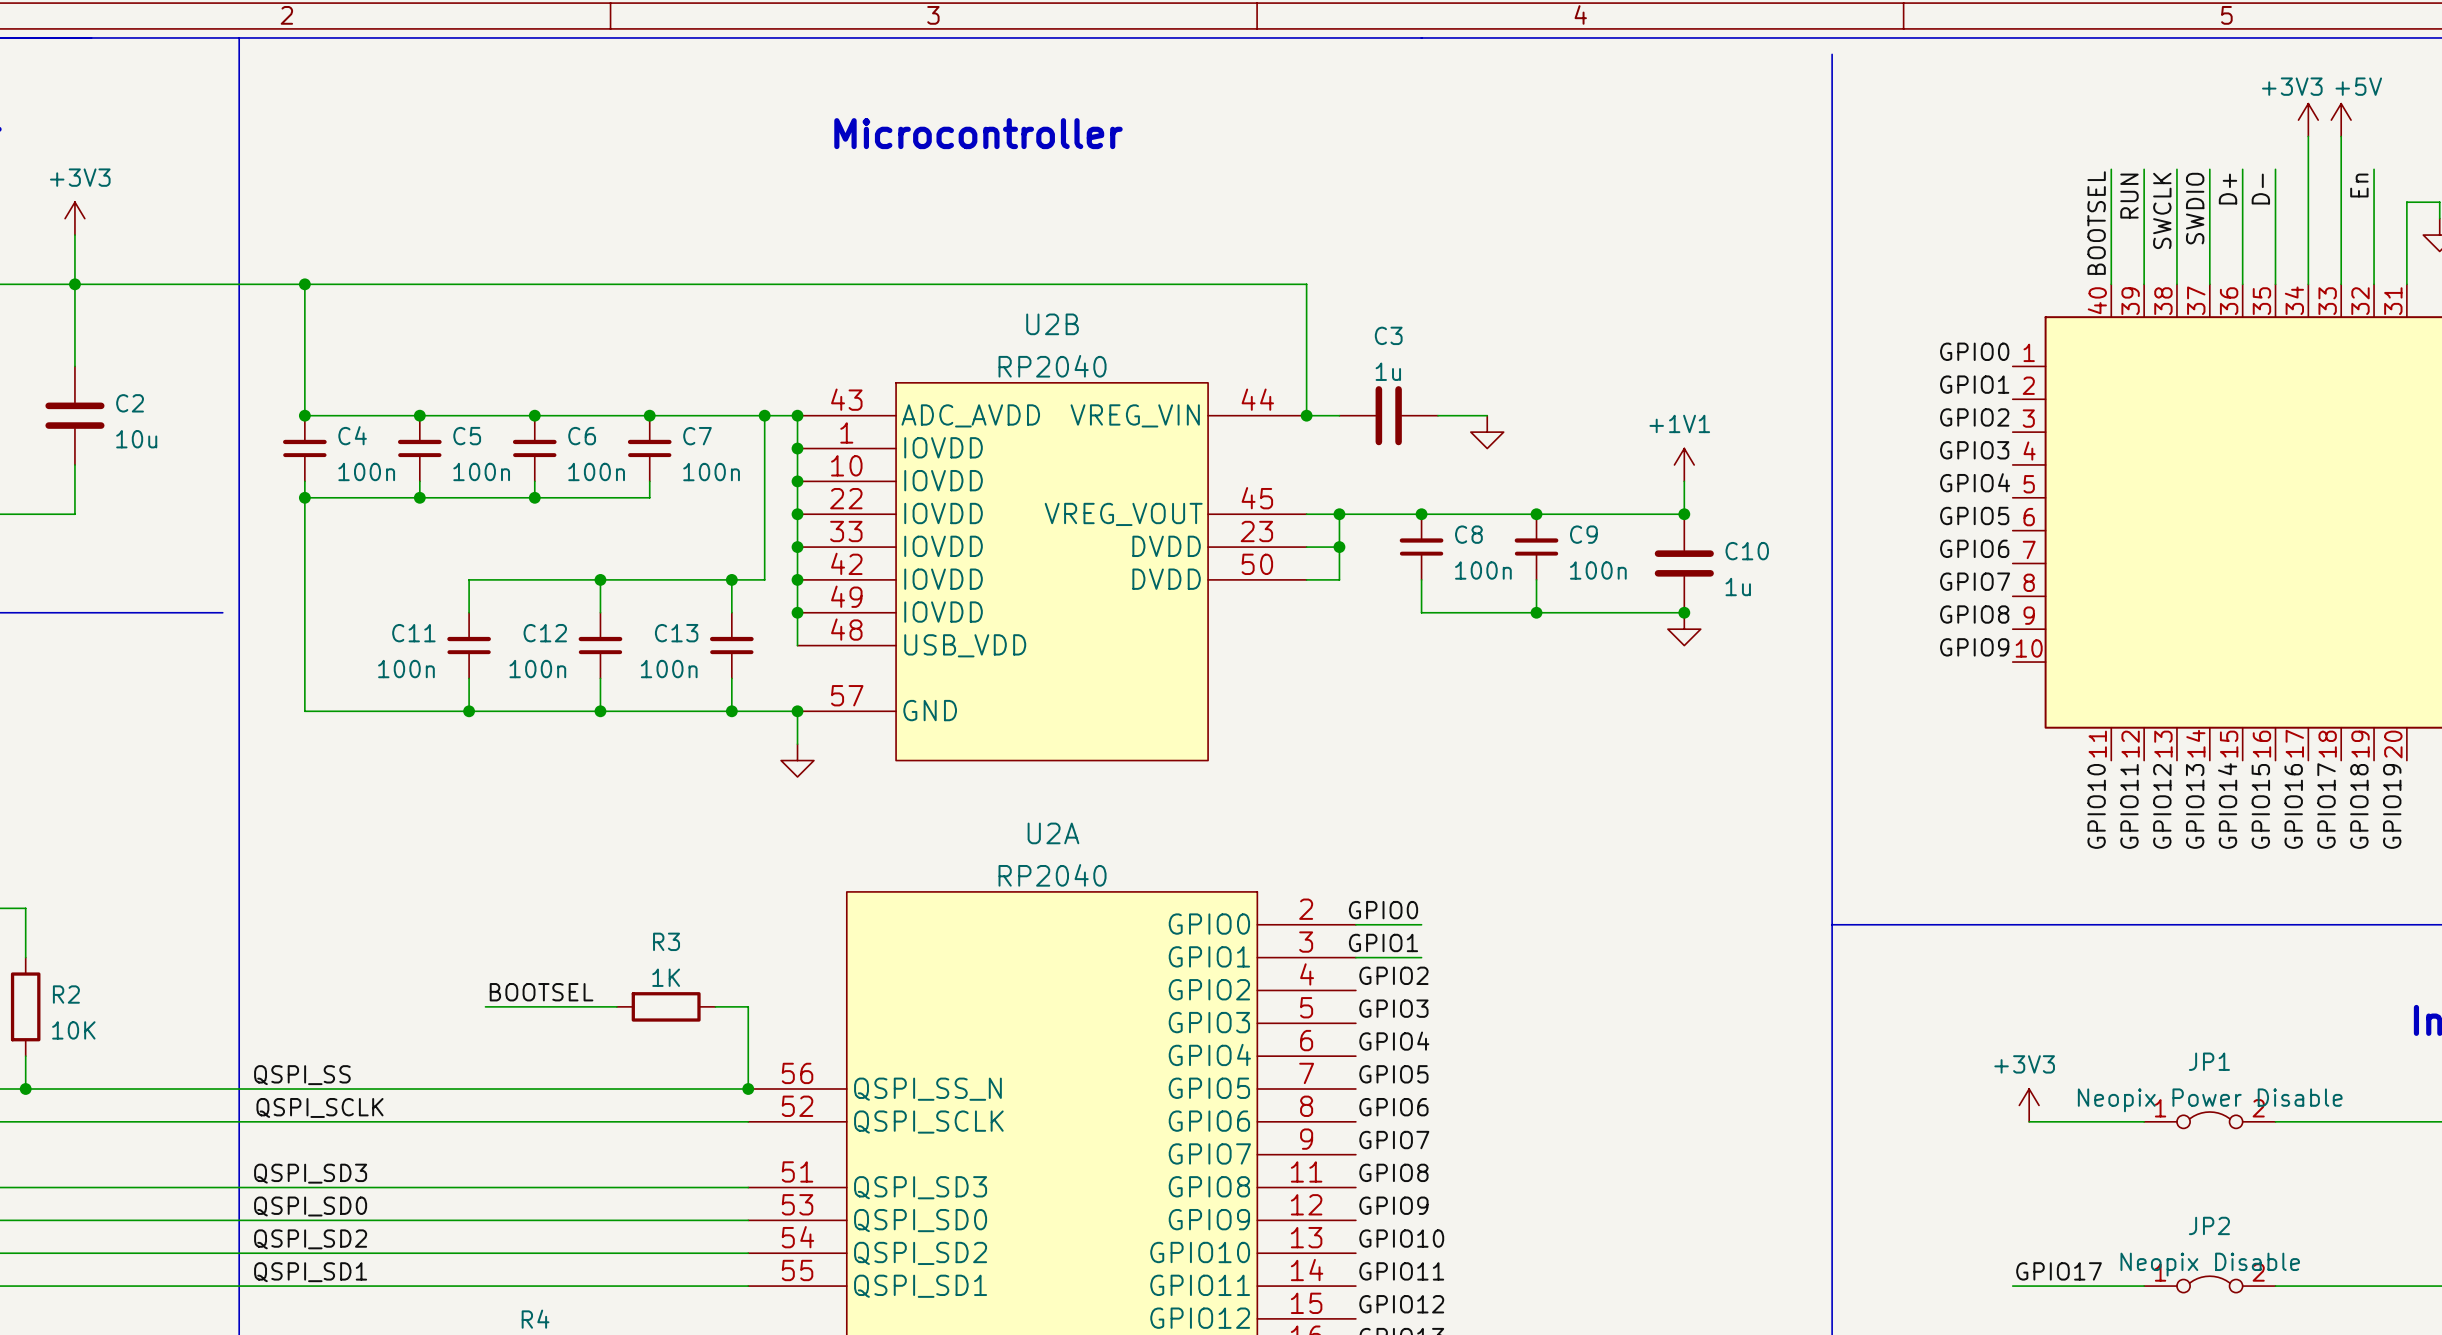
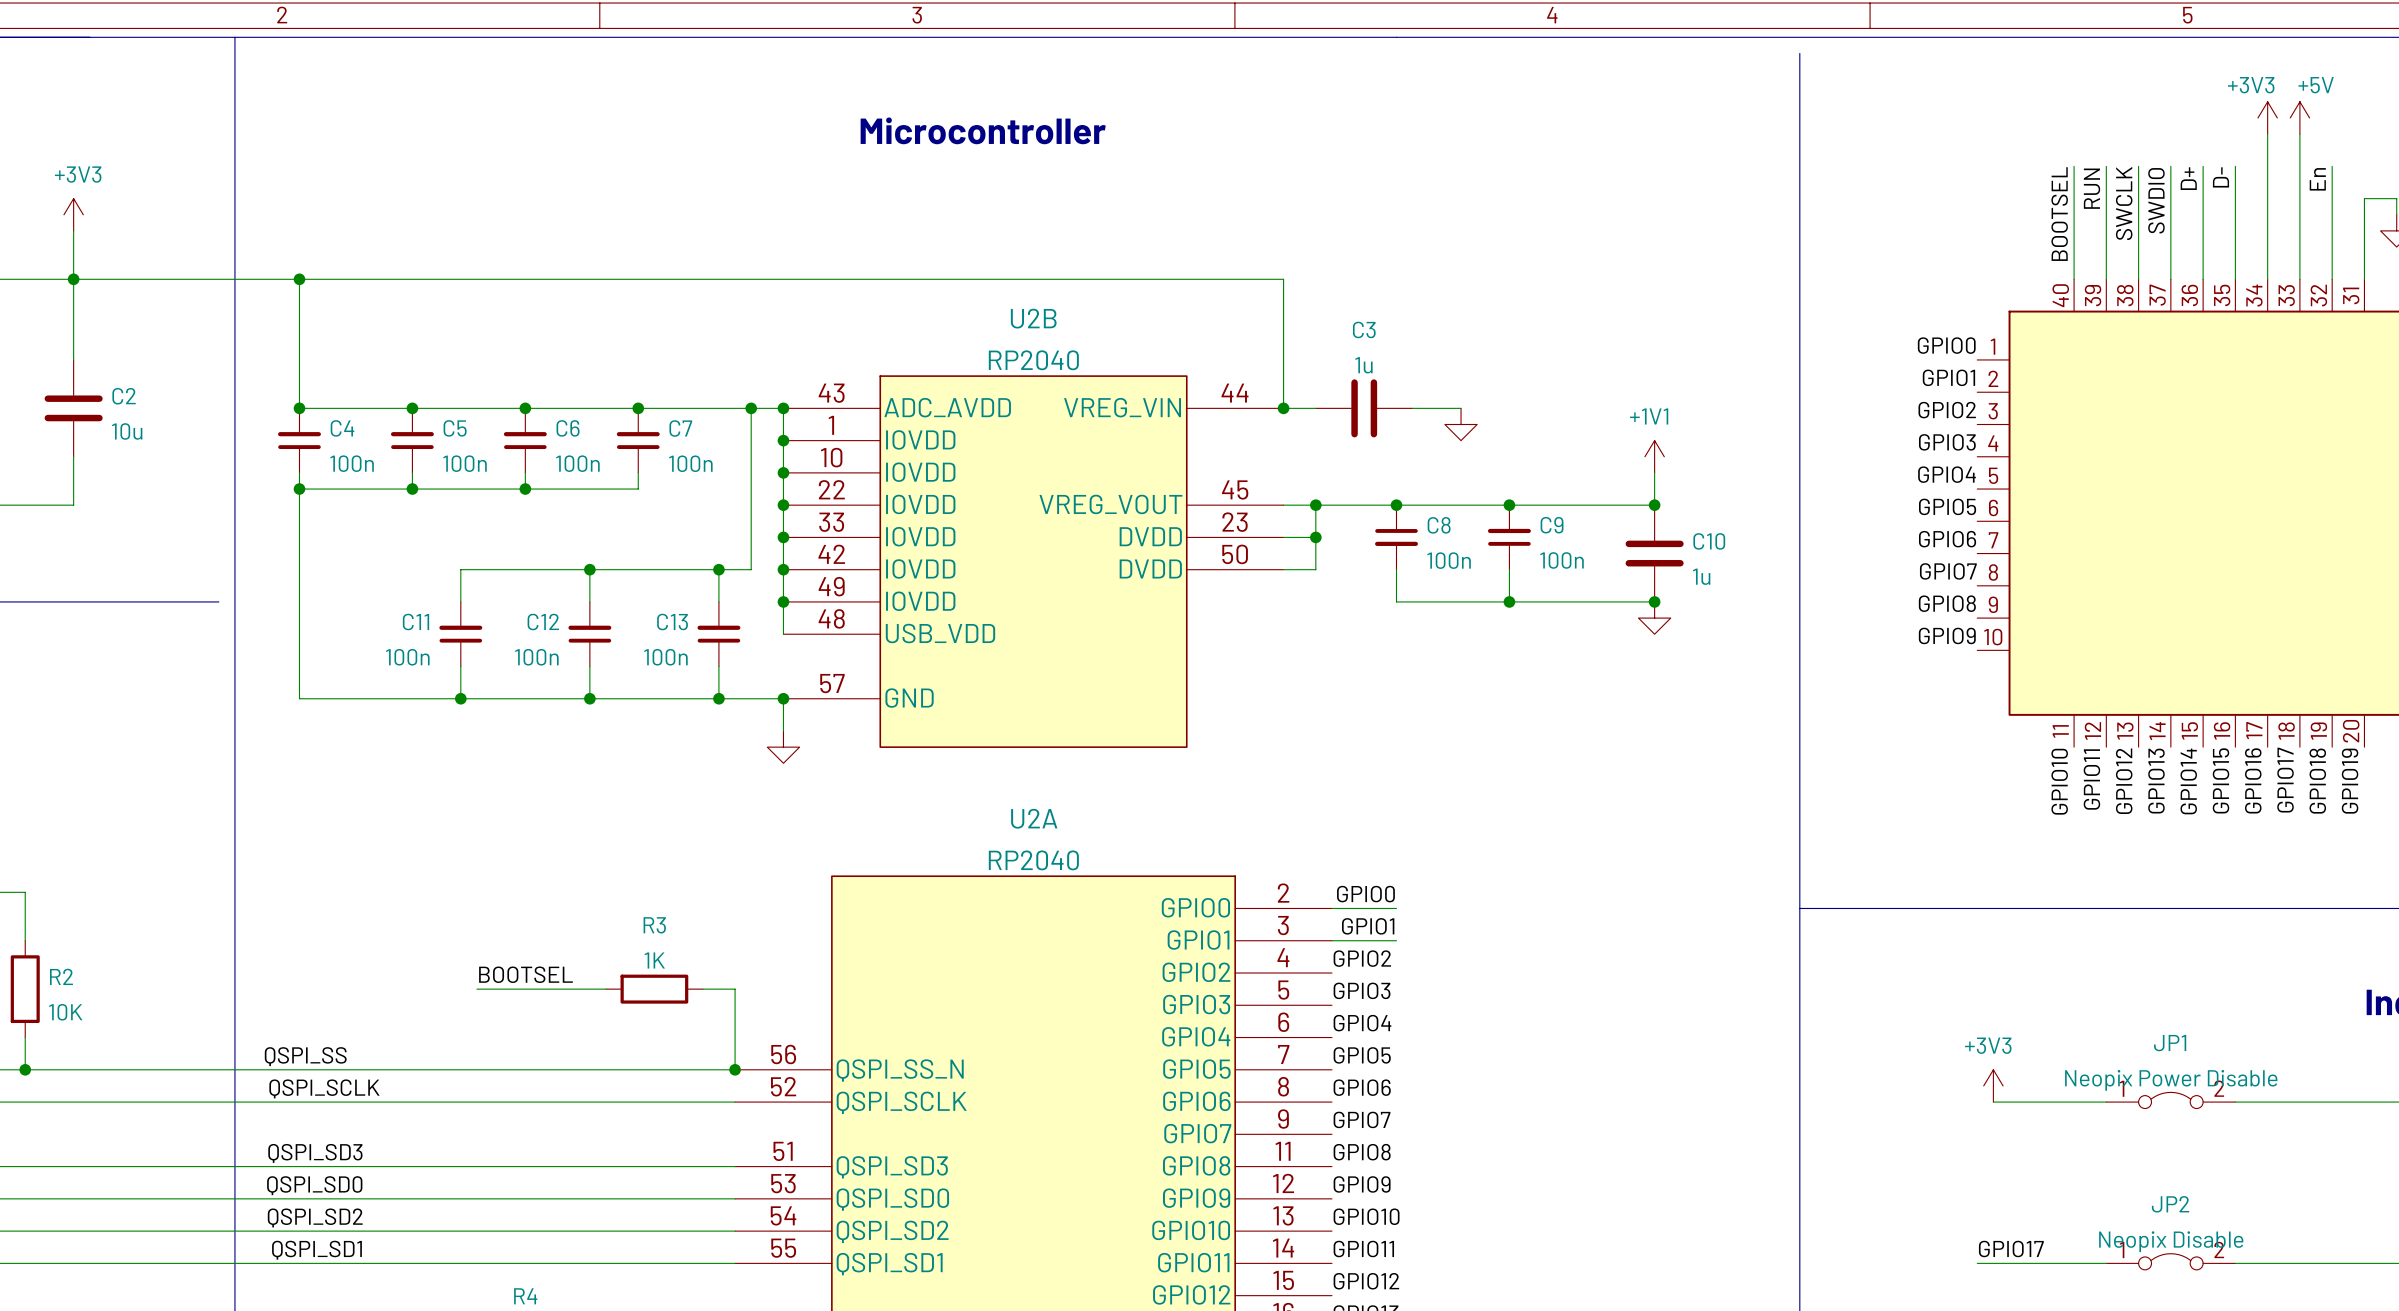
C8 rotation: 0° (1421, 546) -> 180° (1396, 537)

